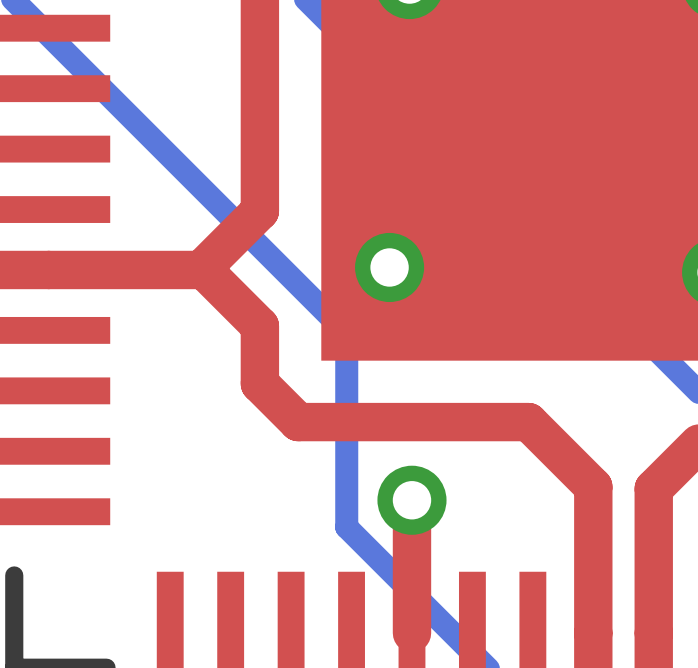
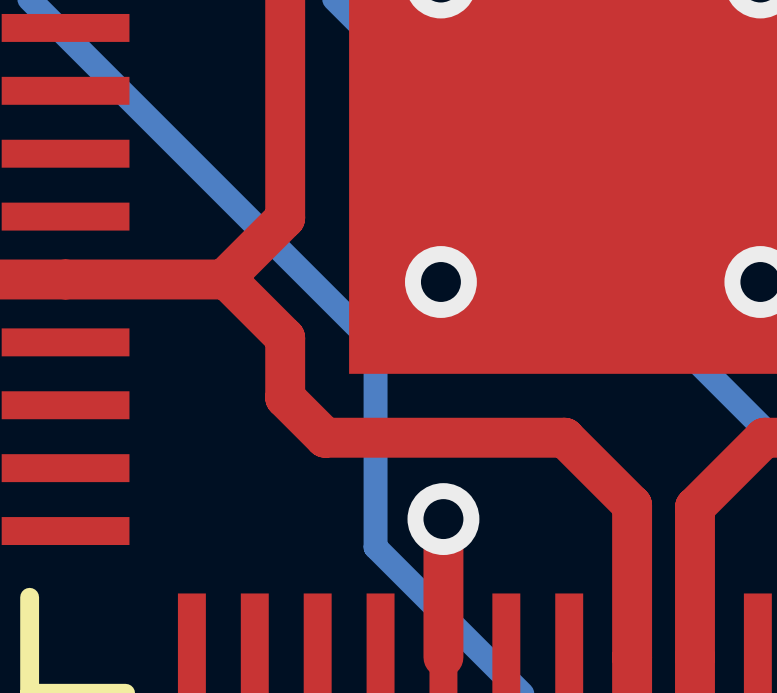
via position: (389, 267) -> (440, 282)

